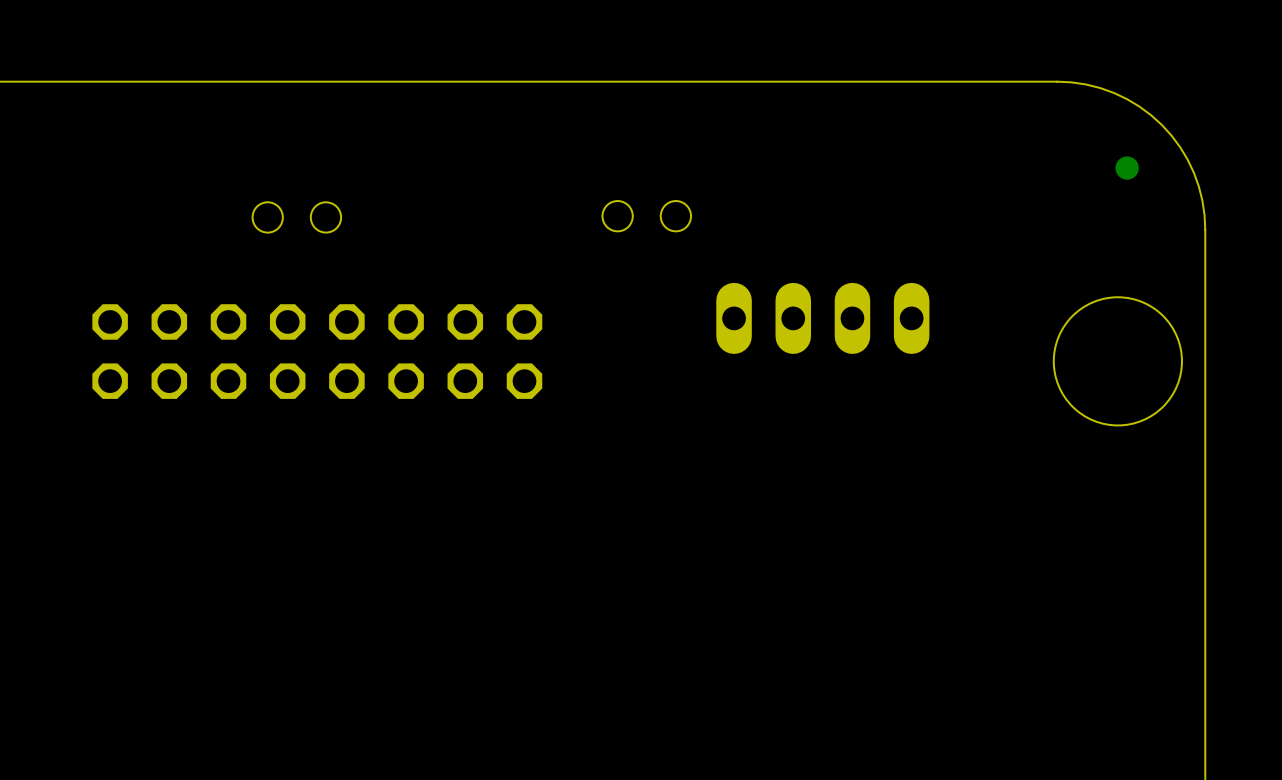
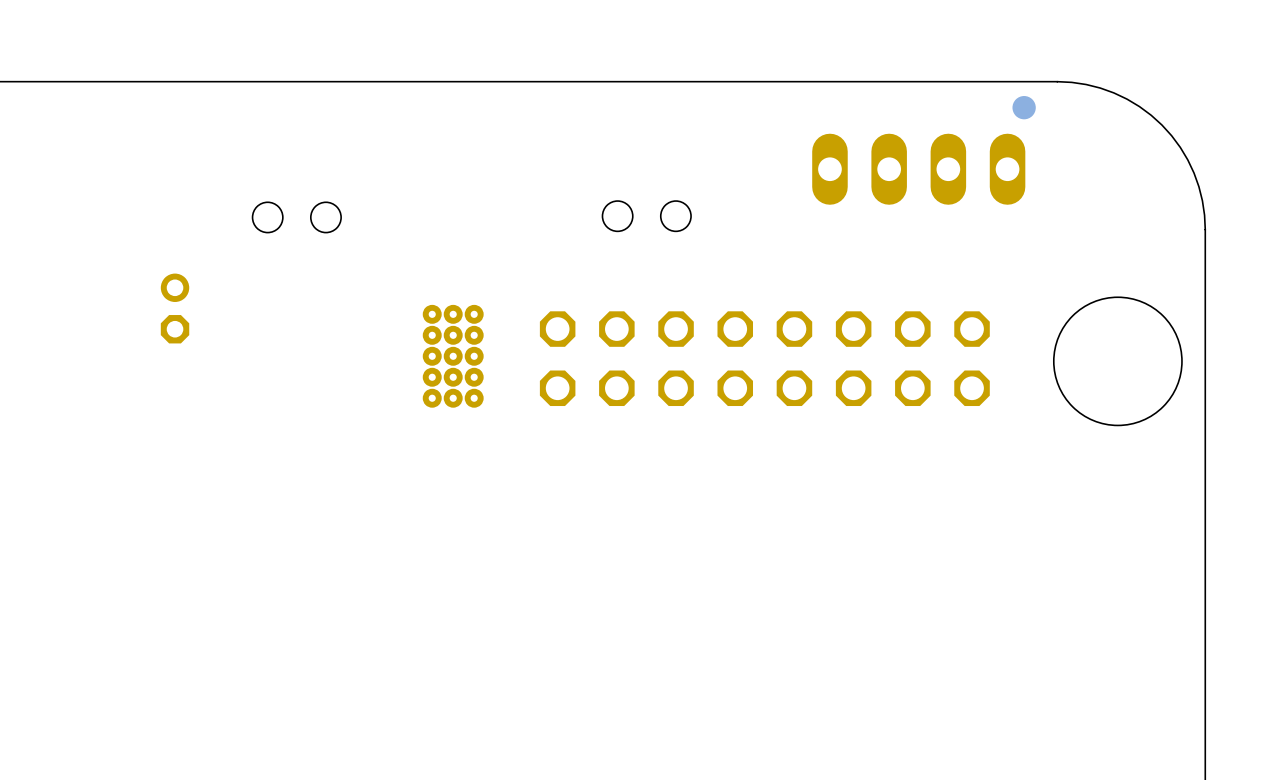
part position: (1127, 168) -> (1024, 107)
part: none -> (175, 308)
part position: (822, 318) -> (918, 169)
part position: (317, 351) -> (764, 358)
part: none -> (453, 356)

